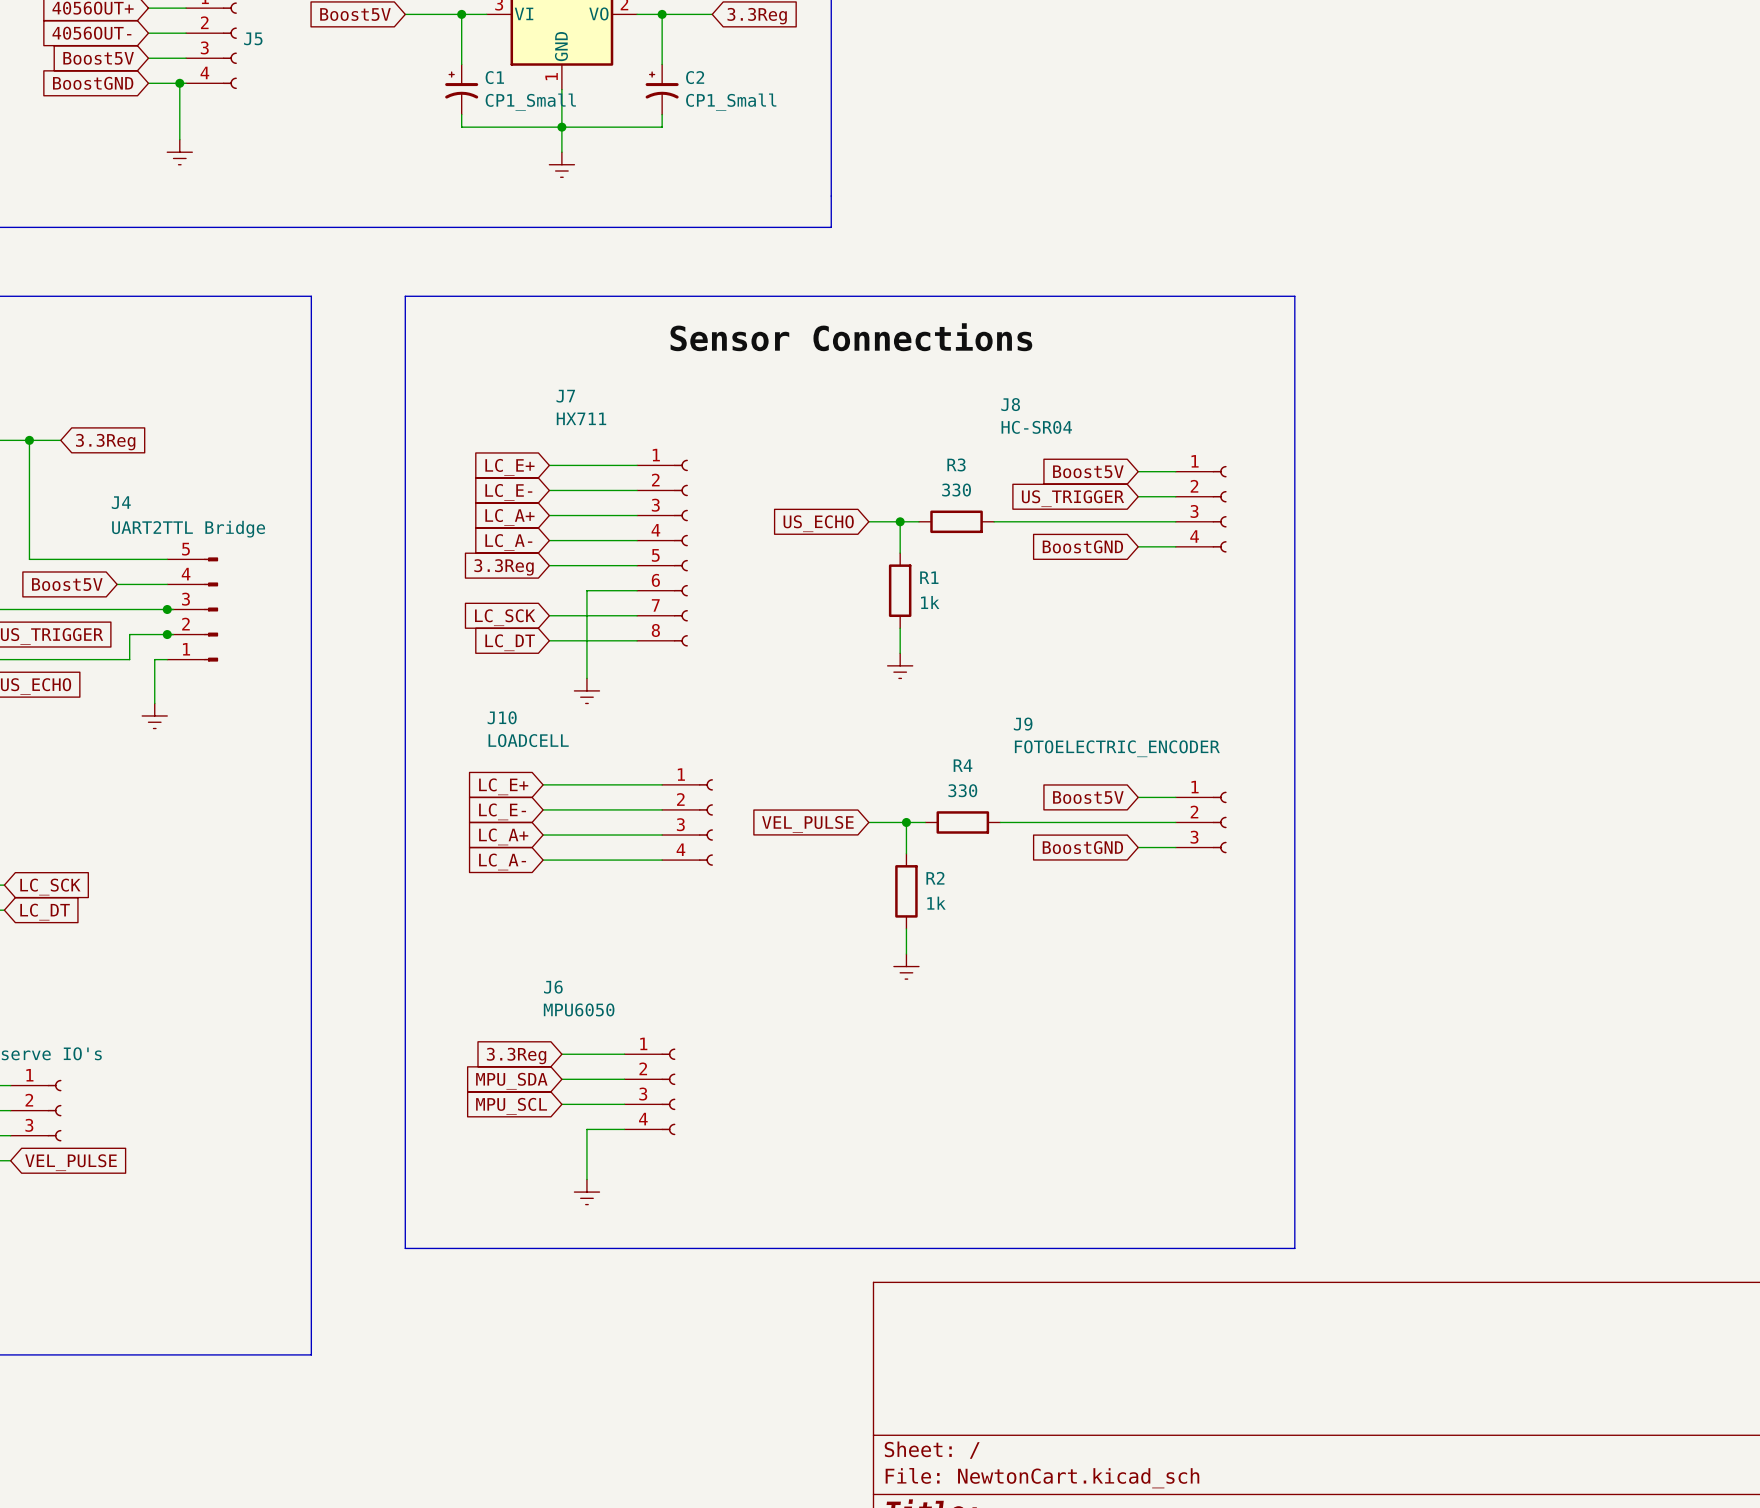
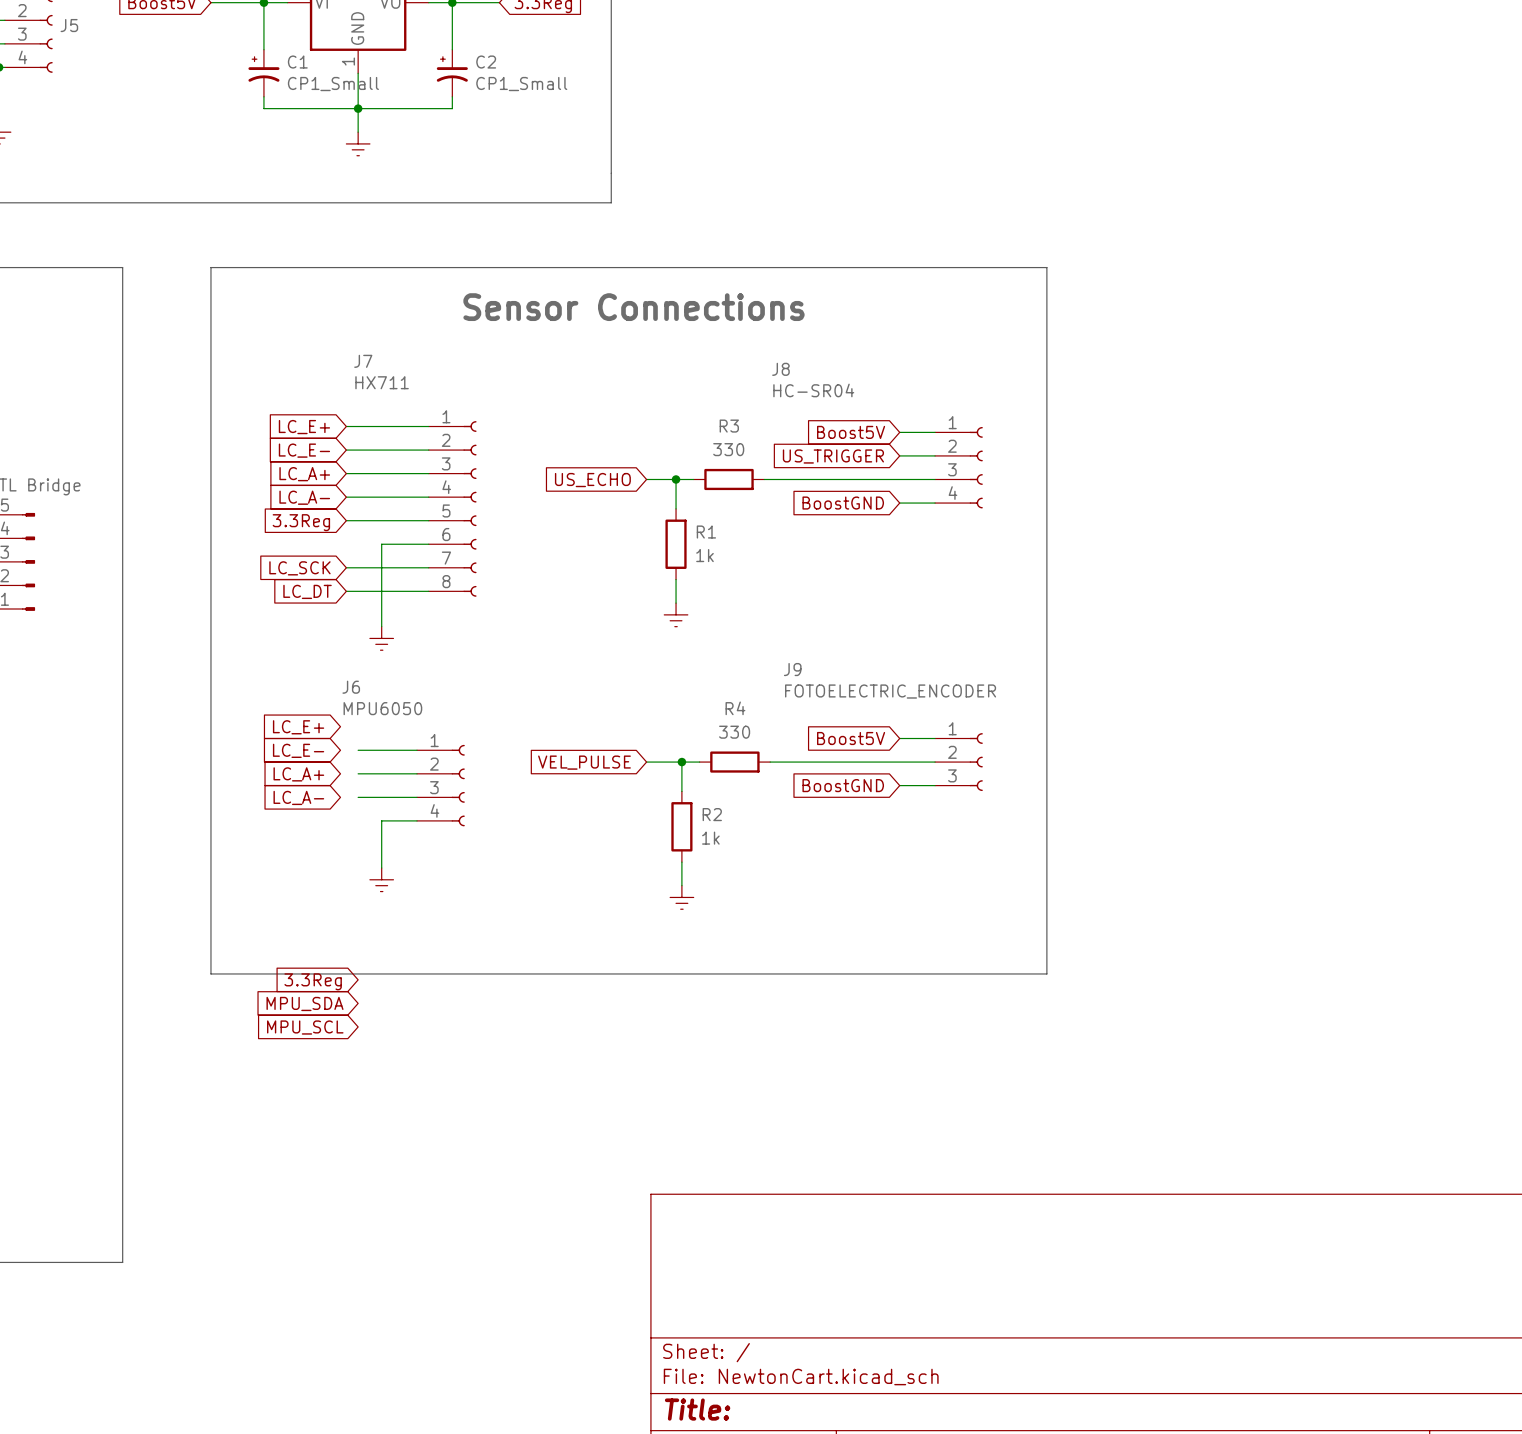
wire: (543, 784) (662, 784) -> none
wire: (543, 809) (561, 809) -> none
J10: LOADCELL (687, 822) -> none
wire: (543, 835) (561, 835) -> none
wire: (543, 860) (561, 860) -> none
line: (405, 1047) (405, 1248) (1294, 1248) (1294, 1047) -> (210, 973) (1046, 973)
wire: (561, 1054) (624, 1054) -> none
wire: (561, 1079) (624, 1079) -> none
J6 position: (649, 1091) -> (440, 785)
wire: (561, 1104) (624, 1104) -> none
wire: (624, 1129) (586, 1129) (586, 1179) -> (417, 820) (381, 820) (381, 868)
power symbol position: (586, 1192) -> (381, 879)

